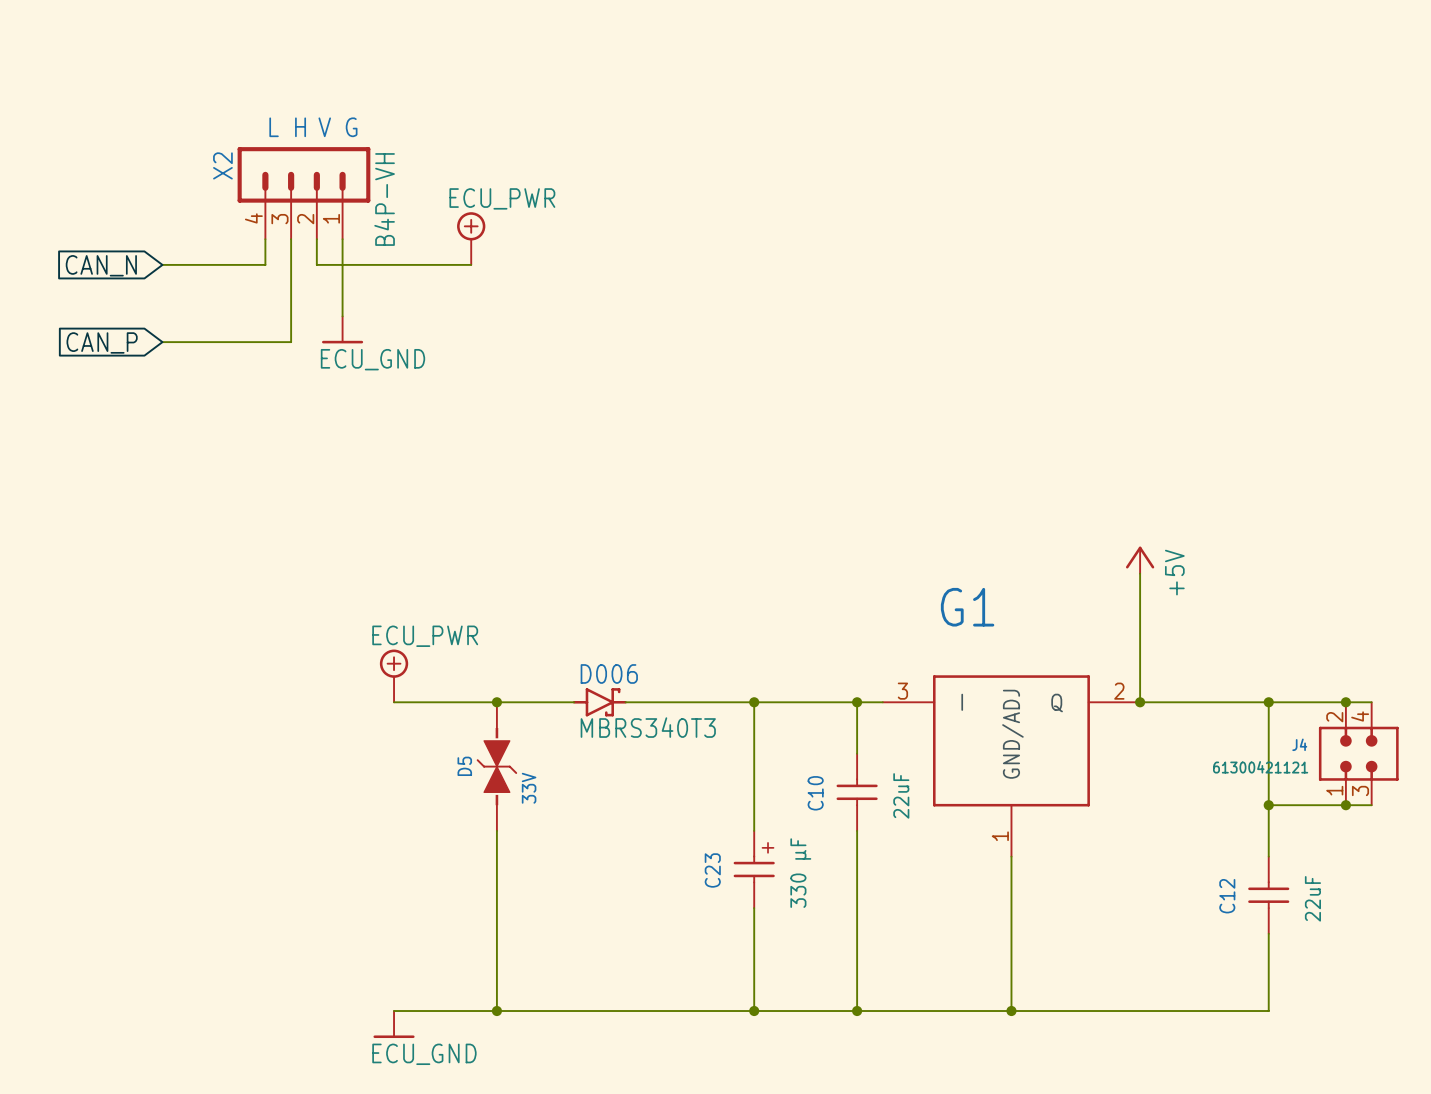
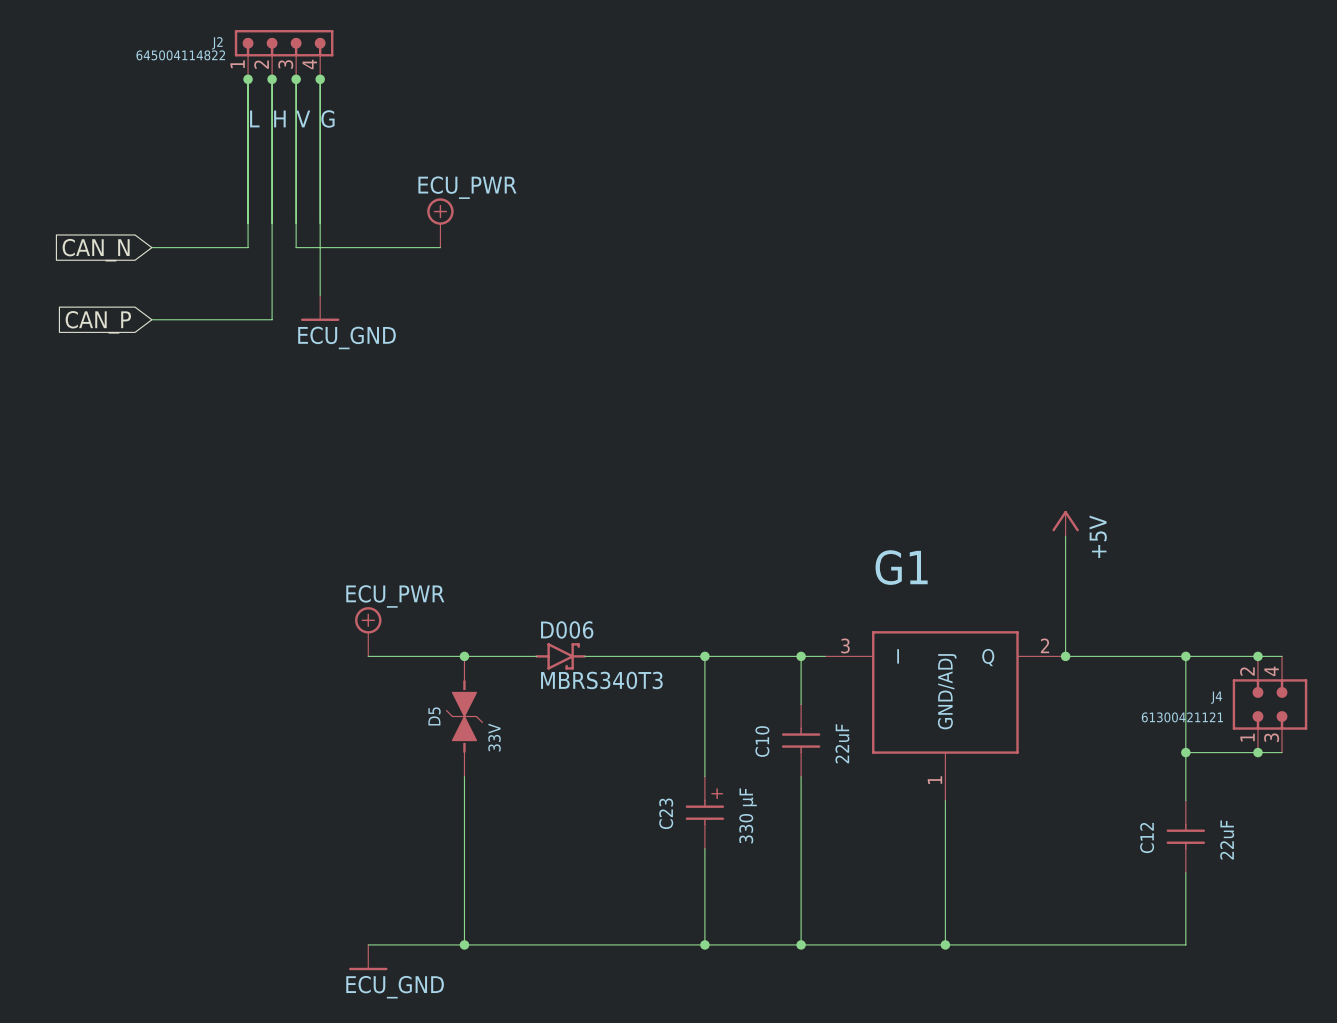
J2: none -> 645004114822 (284, 54)
wire: none -> (248, 79) (248, 223)
junction: none -> (248, 79)
wire: none -> (272, 79) (272, 223)
junction: none -> (272, 79)
wire: none -> (296, 79) (296, 223)
junction: none -> (296, 79)
wire: none -> (320, 79) (320, 223)
junction: none -> (320, 79)
X2: B4P-VH (303, 193) -> none

